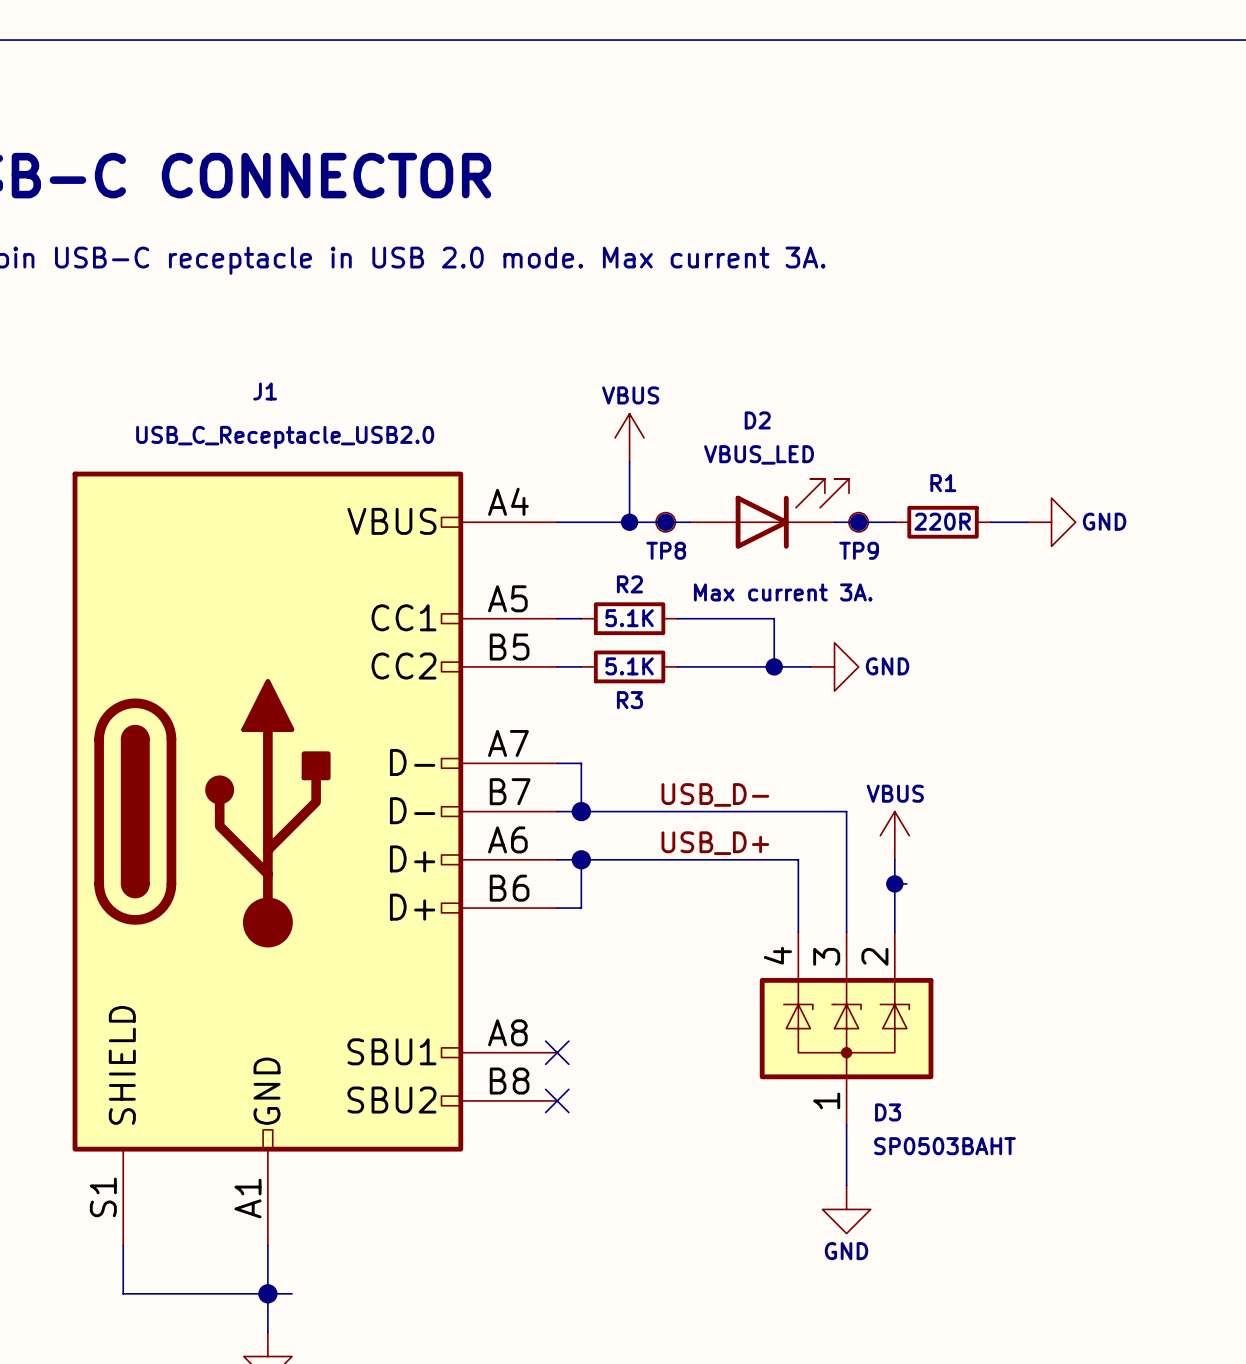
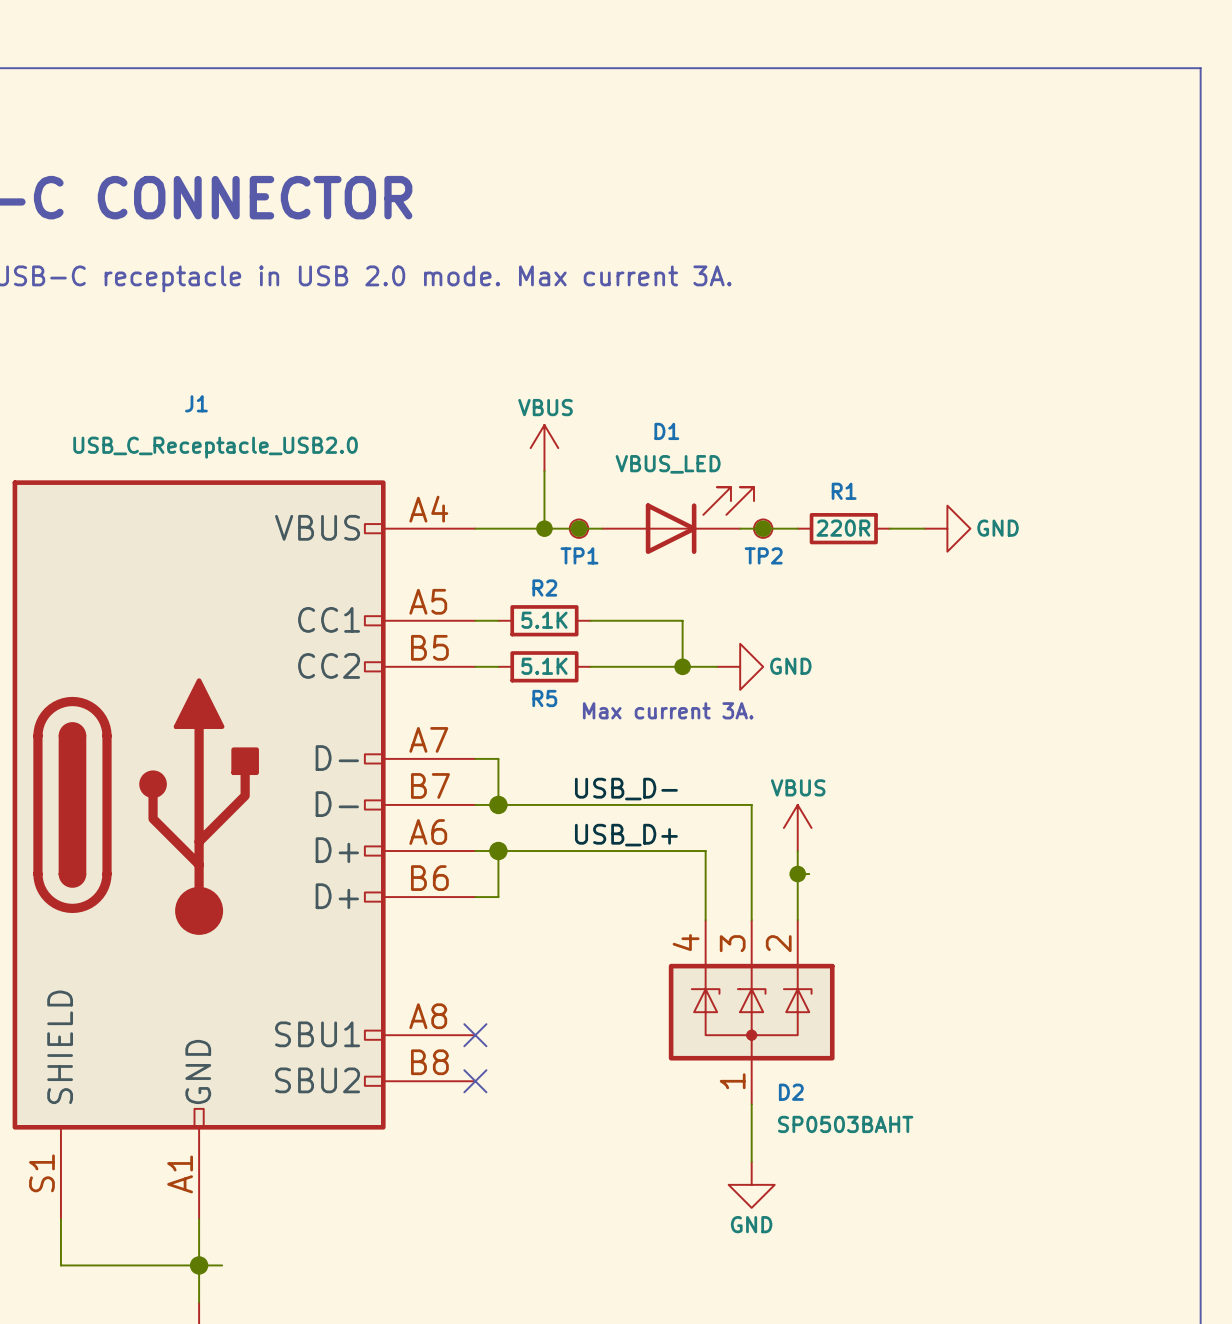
D2 name: D2 (757, 420) -> D1 (666, 431)
TP8 name: TP8 (666, 550) -> TP1 (579, 555)
TP9 name: TP9 (859, 550) -> TP2 (763, 555)
text position: Max current 3A. (783, 592) -> Max current 3A. (668, 710)
R3 name: R3 (629, 700) -> R5 (544, 698)
D3 name: D3 (888, 1112) -> D2 (791, 1092)

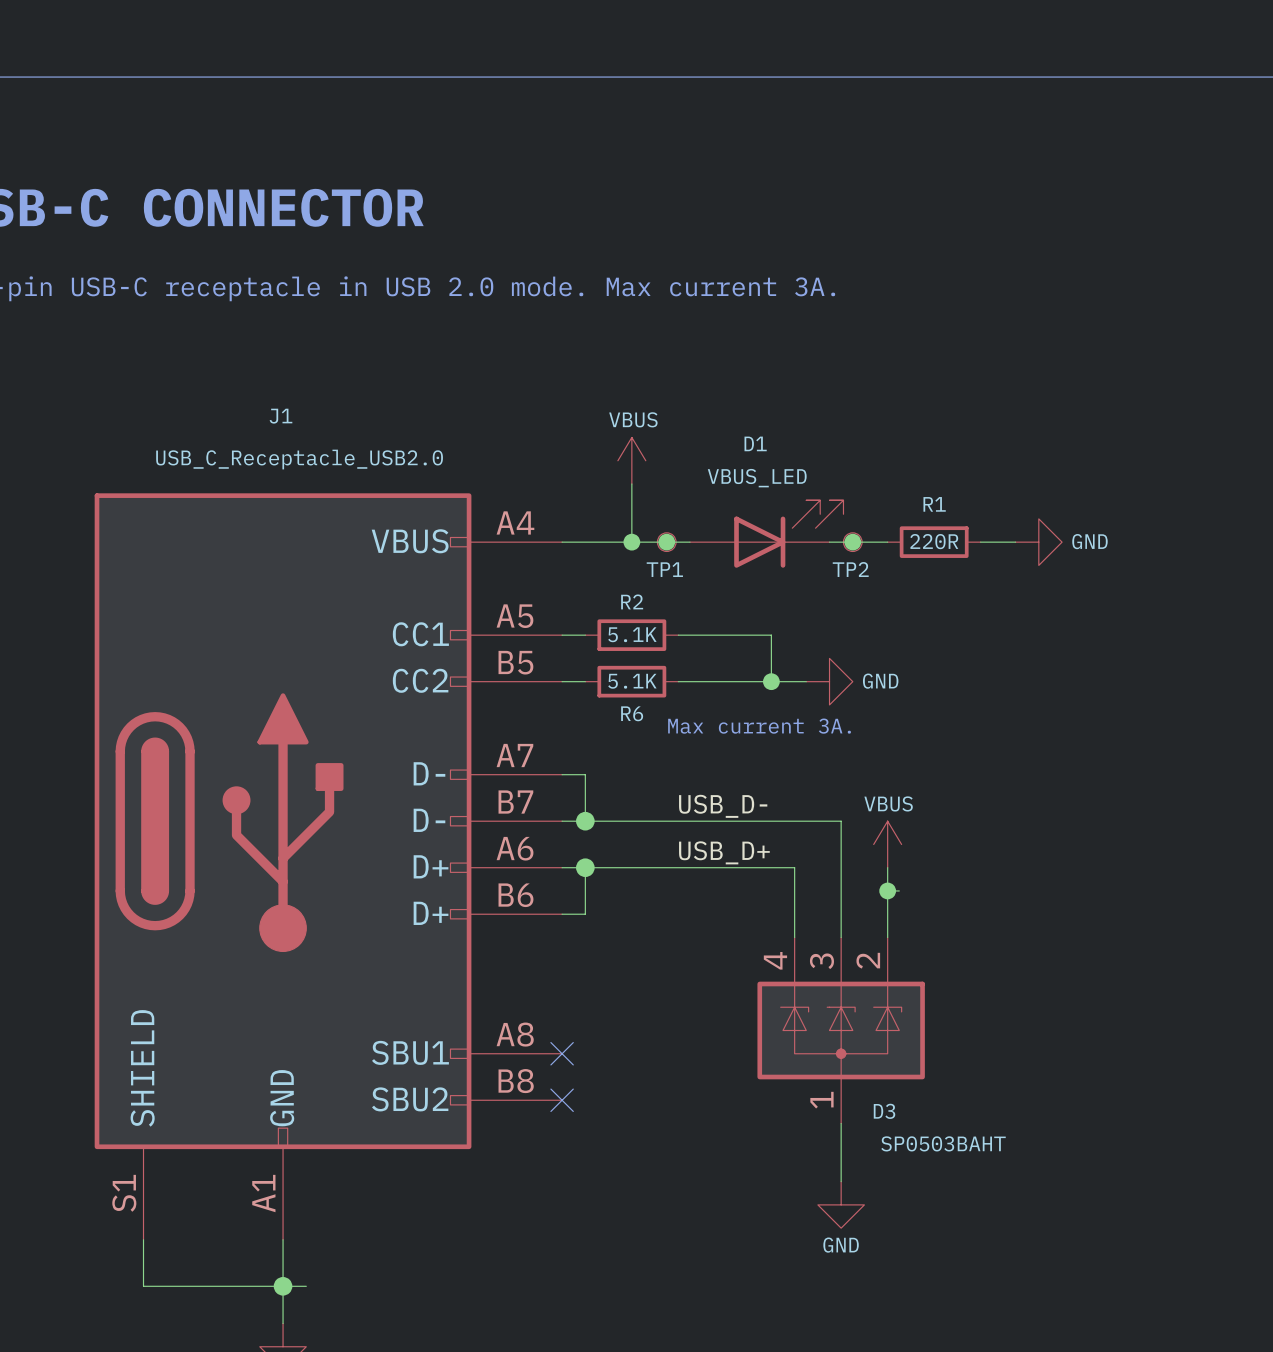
R5 name: R5 (544, 698) -> R6 (632, 713)
D2 name: D2 (791, 1092) -> D3 (884, 1111)

